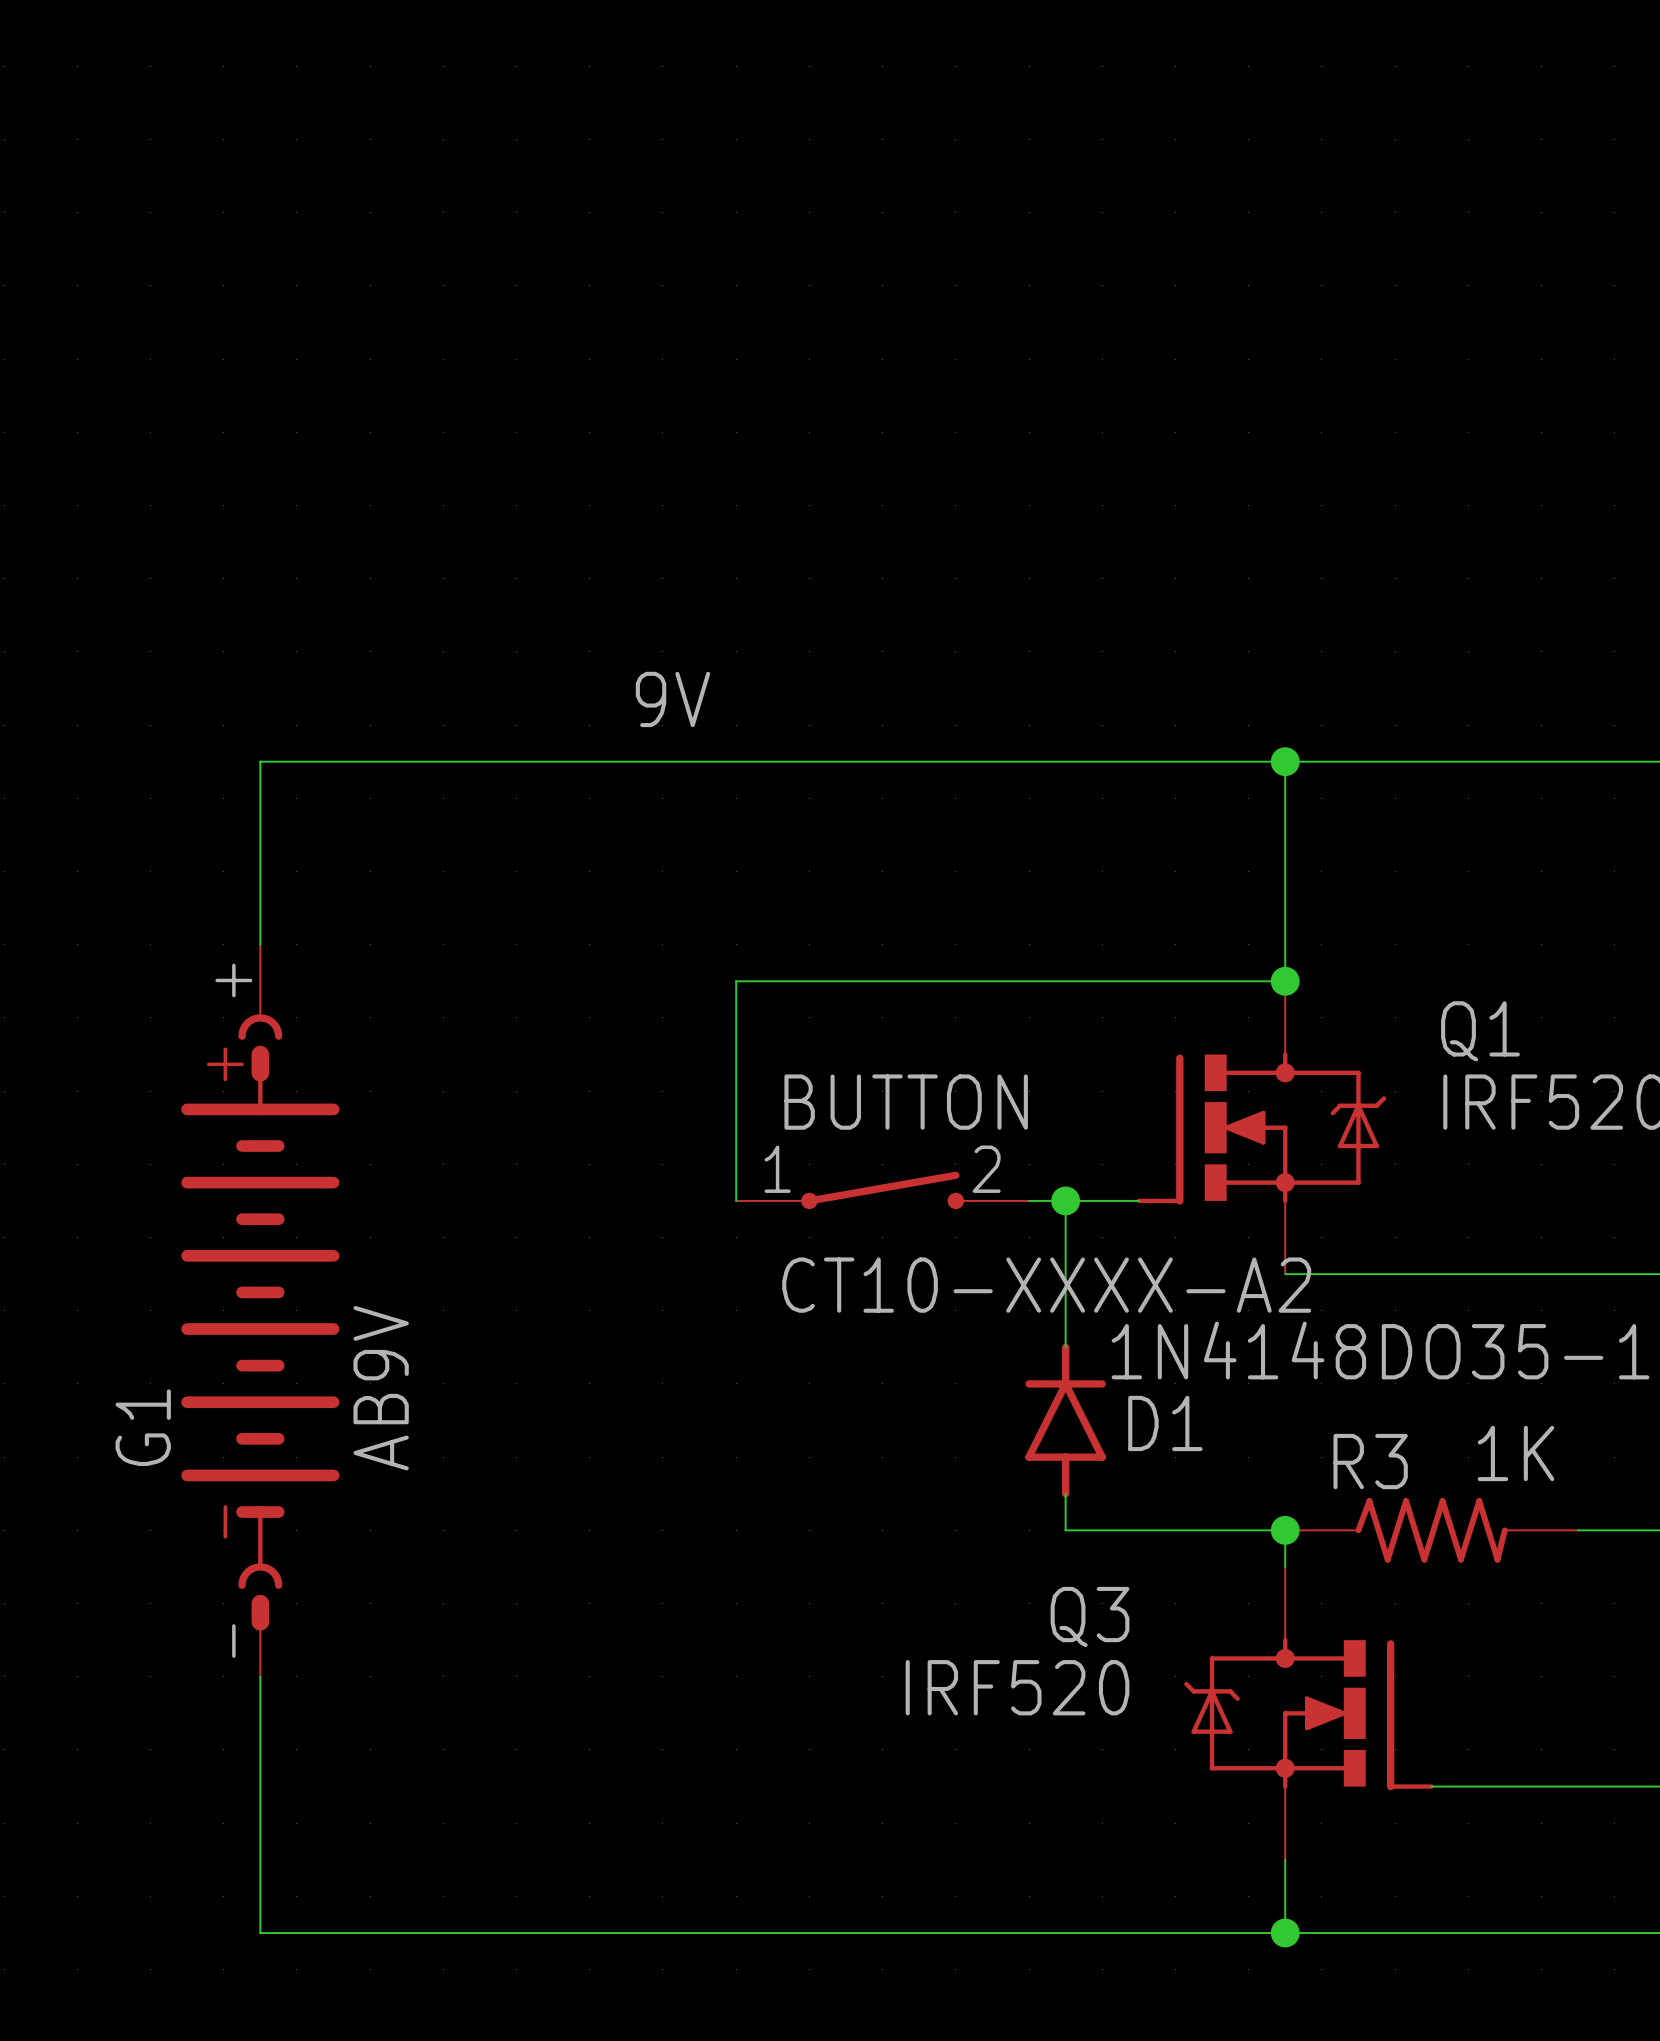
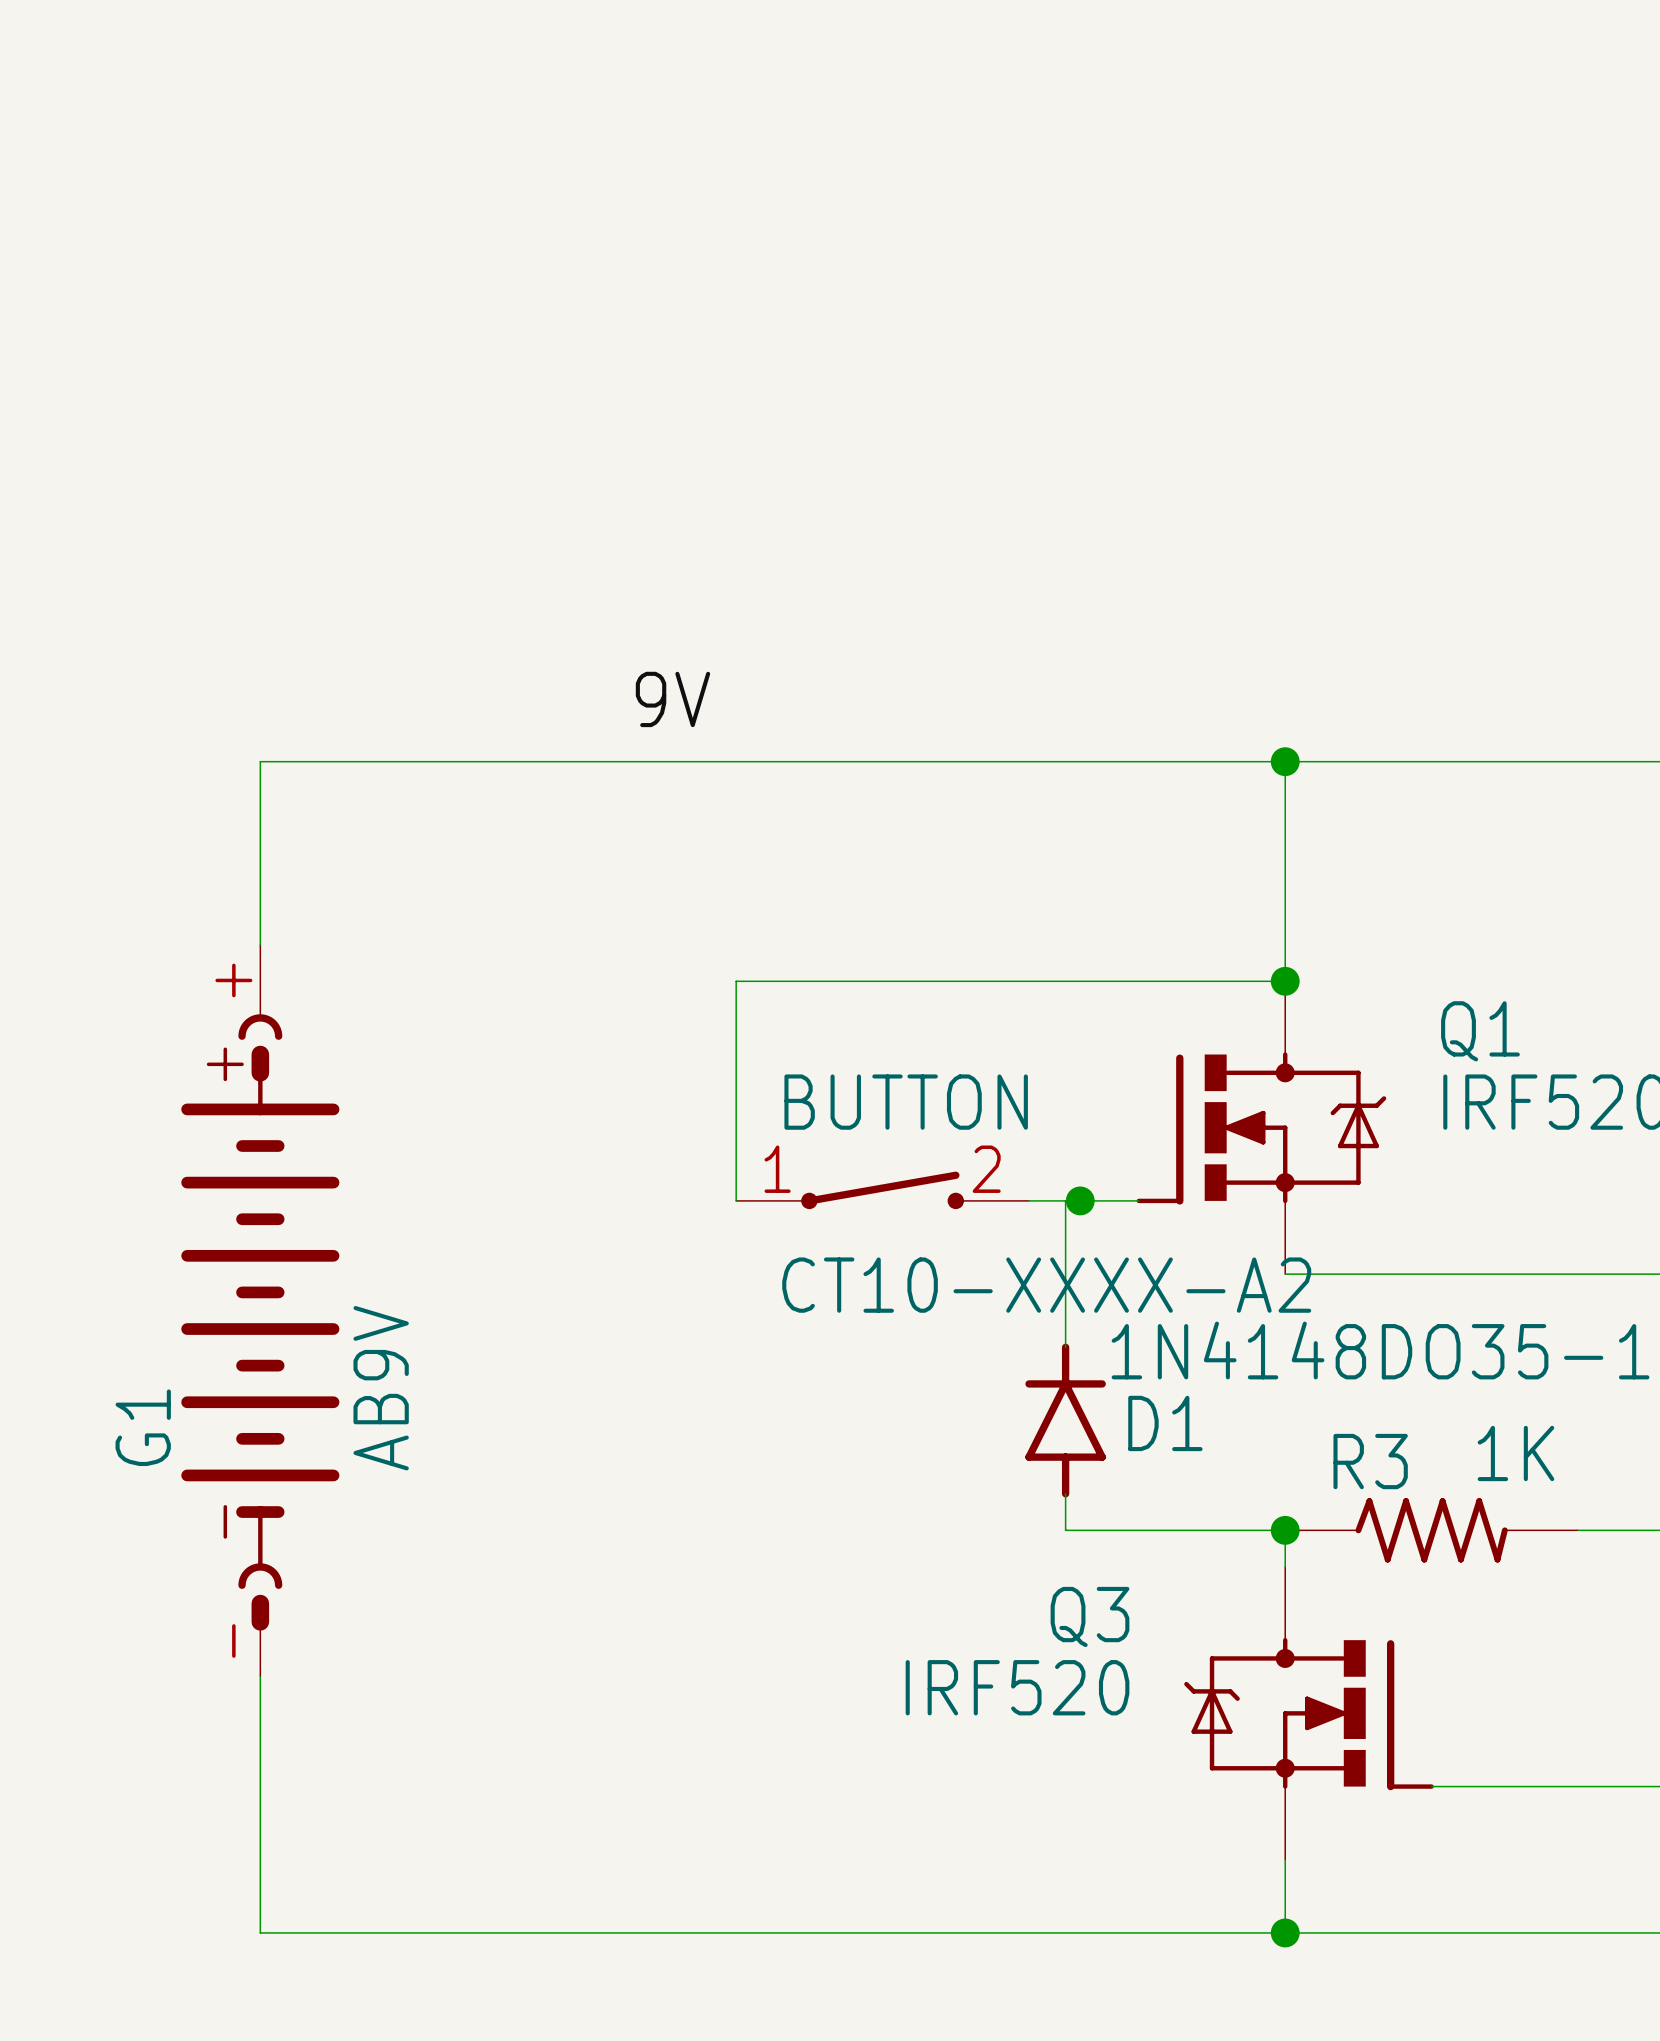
junction position: (1065, 1200) -> (1080, 1200)

